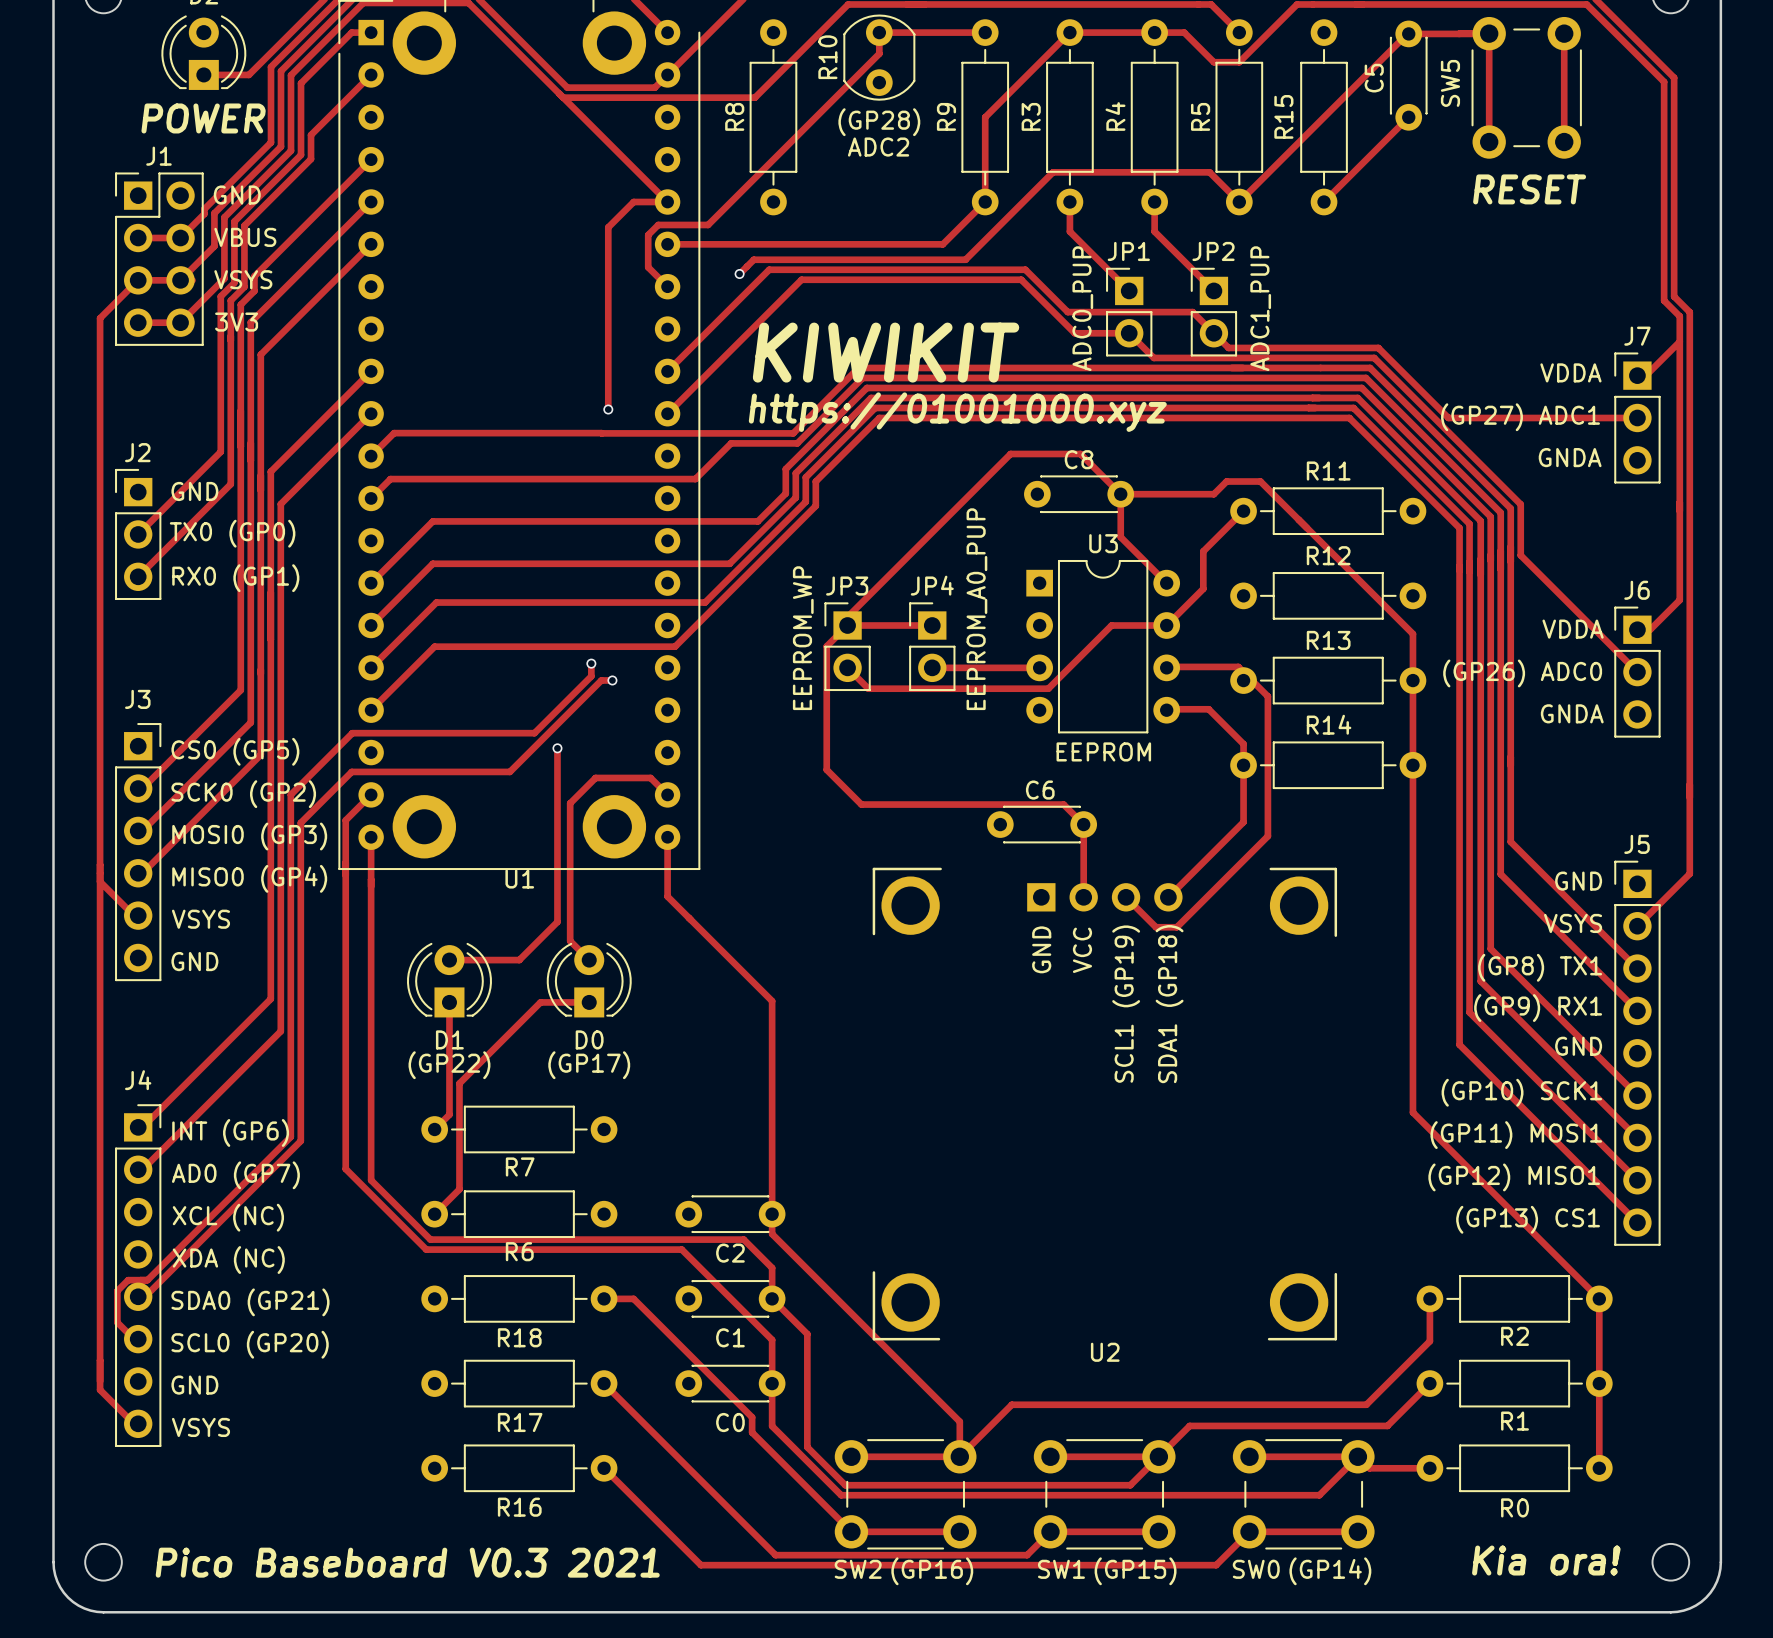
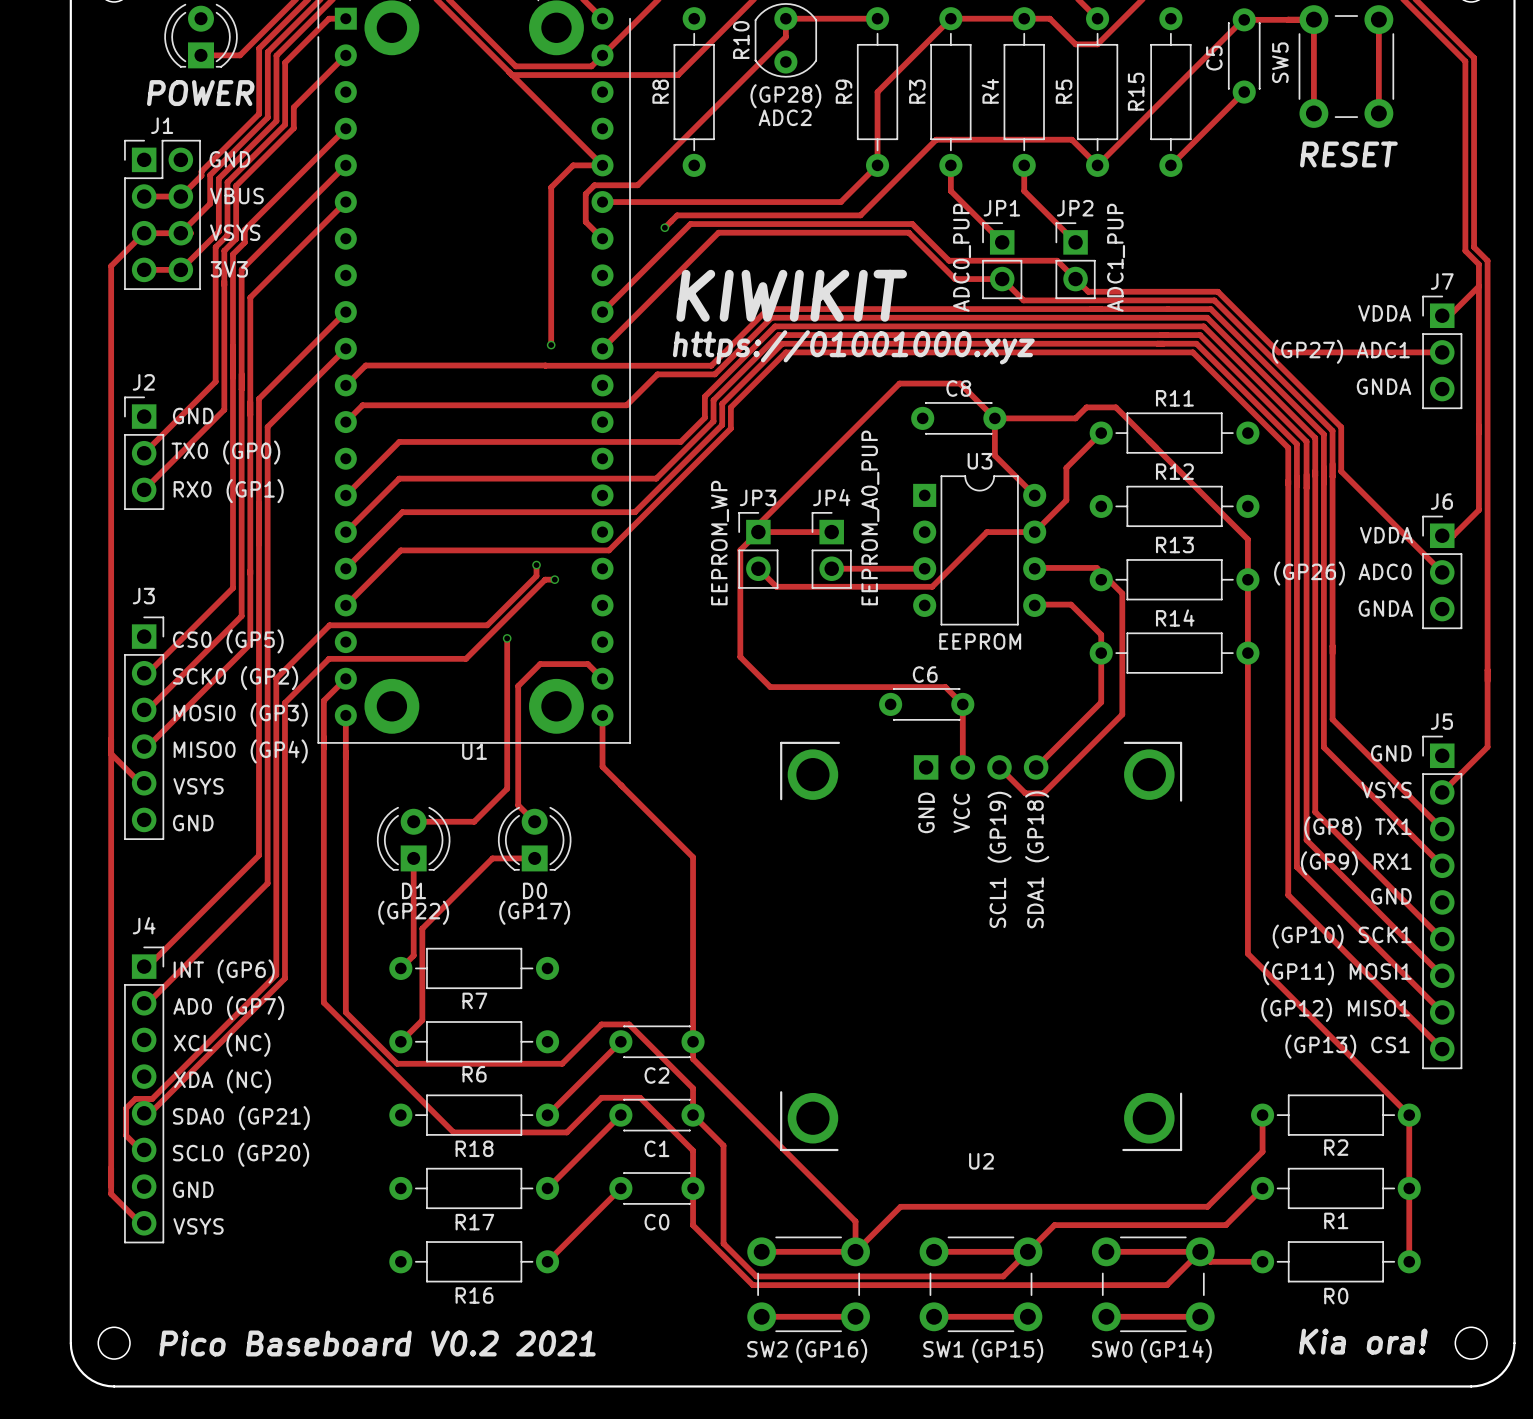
track: (621, 1239) (743, 1239) -> (562, 1063) (601, 1024) (629, 1024) (668, 1063)
track: (426, 1249) (681, 1249) (711, 1278) -> (393, 1072) (453, 1132) (566, 1132) (601, 1097) (640, 1097)
track: (604, 1298) (633, 1298) (752, 1417) (752, 1432) (851, 1531) -> (547, 1115) (620, 1041)
track: (604, 1383) (775, 1555) (1027, 1555) (1050, 1531) -> (547, 1188) (620, 1115)
track: (604, 1468) (700, 1565) (1216, 1565) (1249, 1531) -> (547, 1261) (620, 1188)
text: Pico Baseboard V0.3 2021 (407, 1562) -> Pico Baseboard V0.2 2021 (377, 1343)

